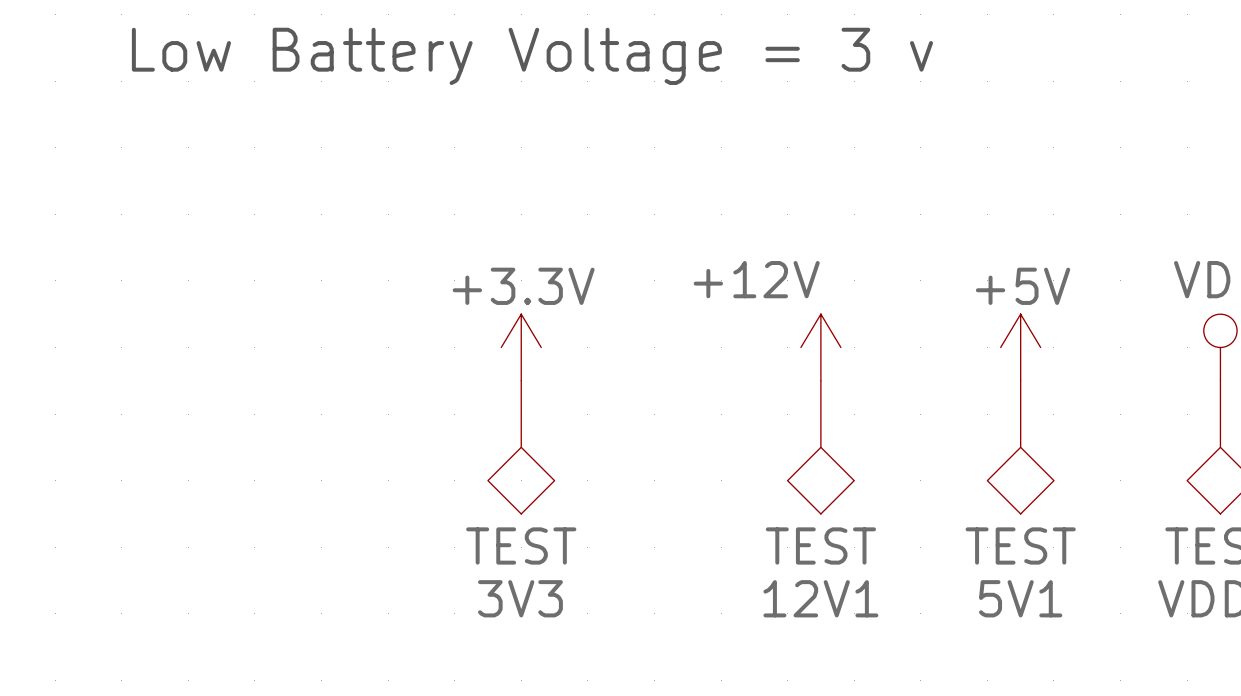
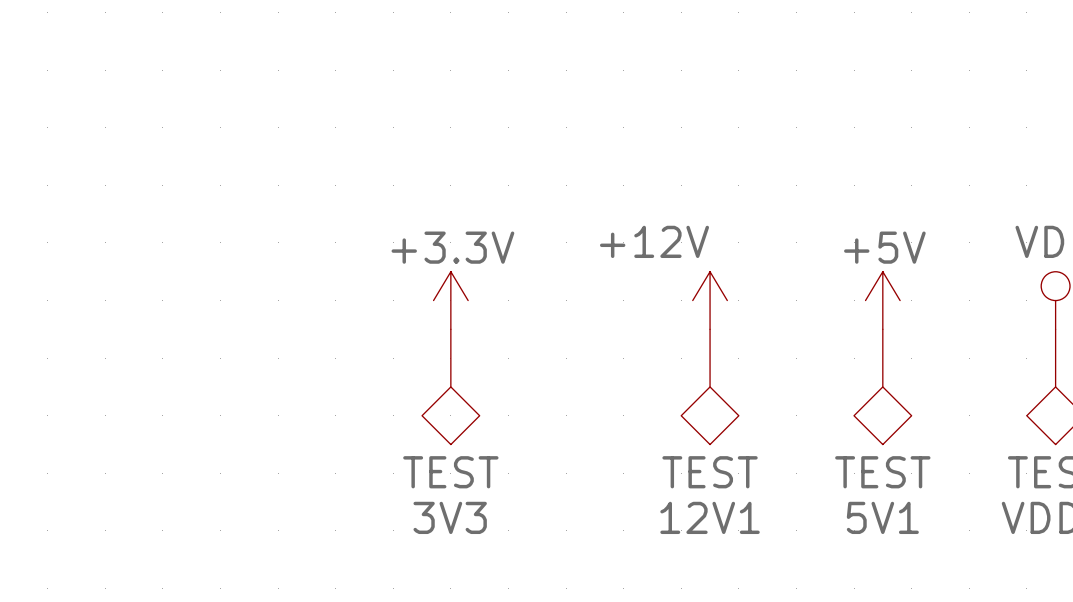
text: Low Battery Voltage = 3 v (532, 56) -> none

